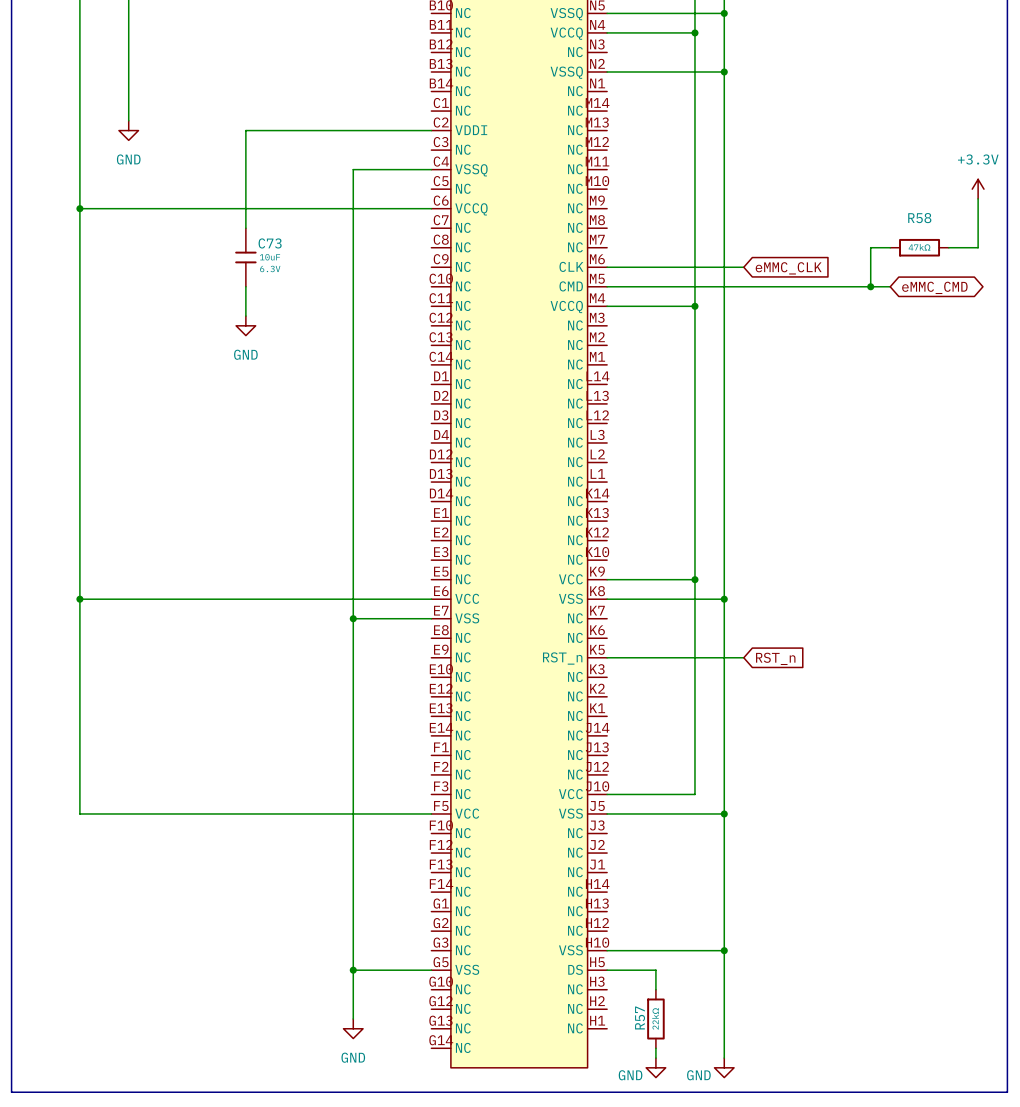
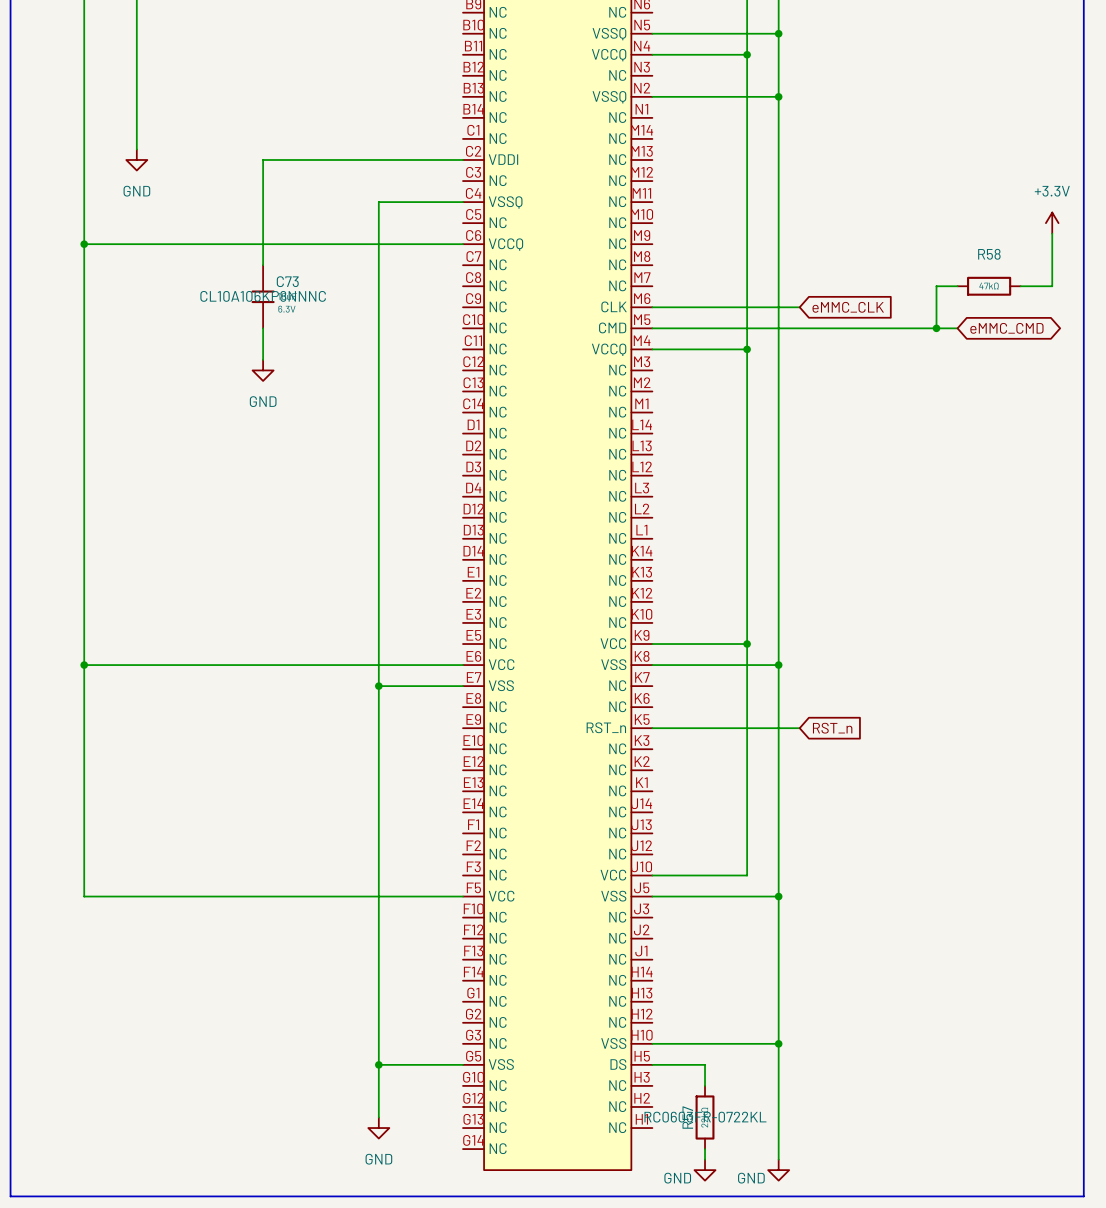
C73 text: none -> CL10A106KP8NNNC (263, 296)
R57 text: none -> RC0603FR-0722KL (705, 1117)

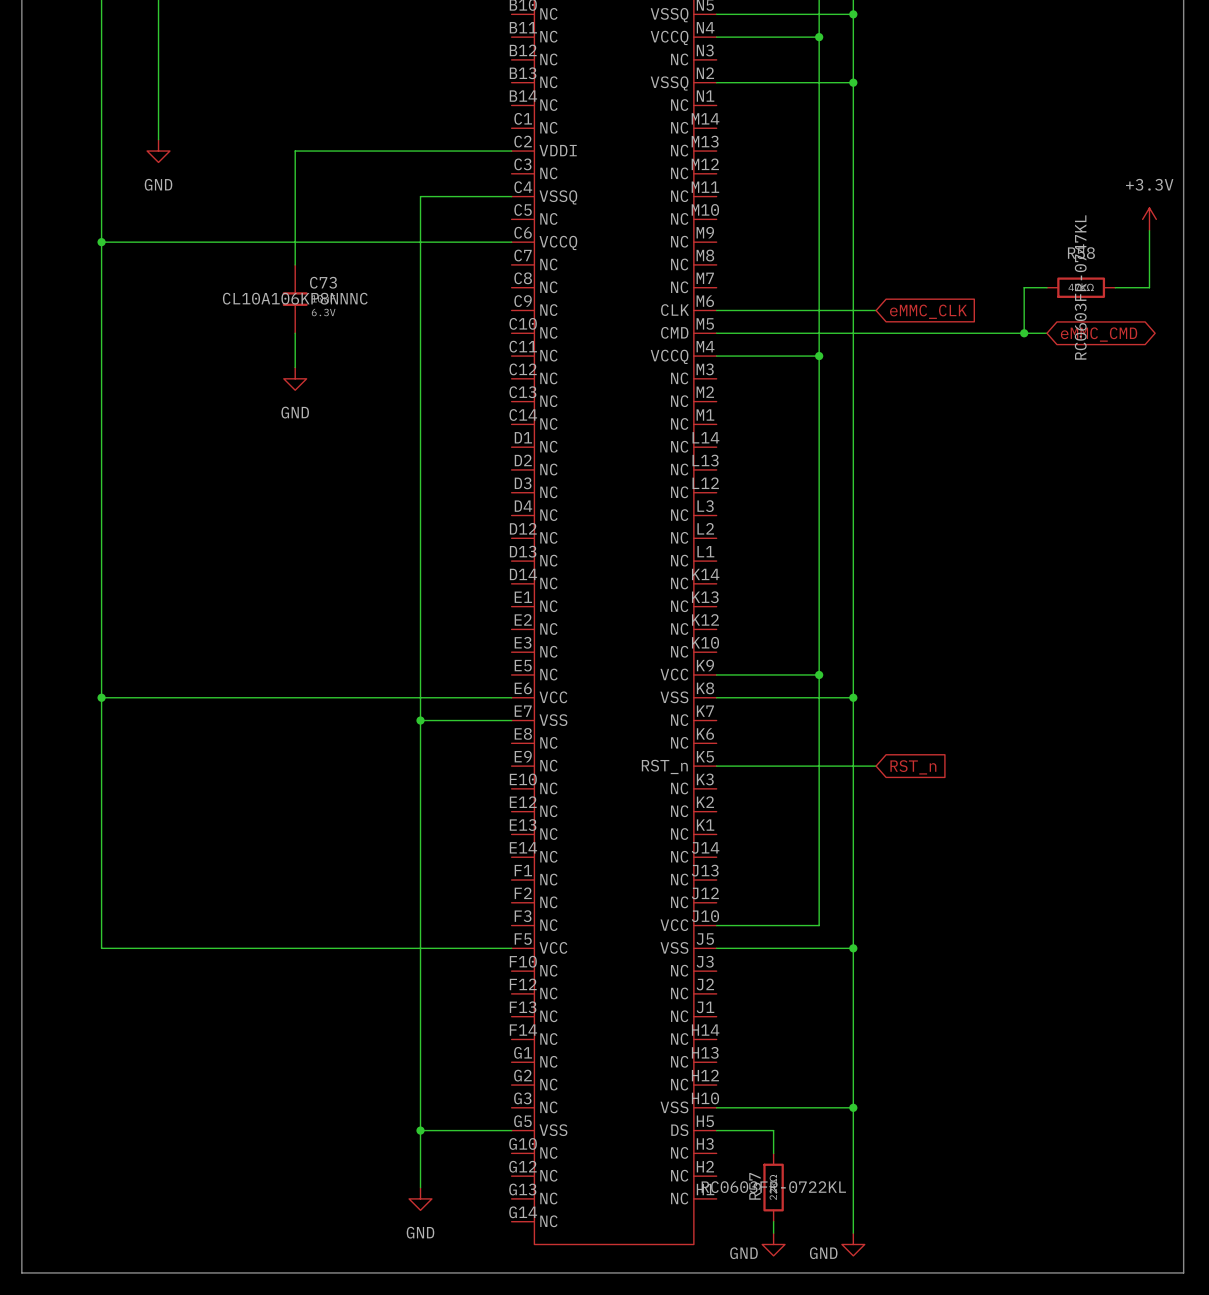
R58 text: none -> RC0603FR-0747KL (1080, 287)

